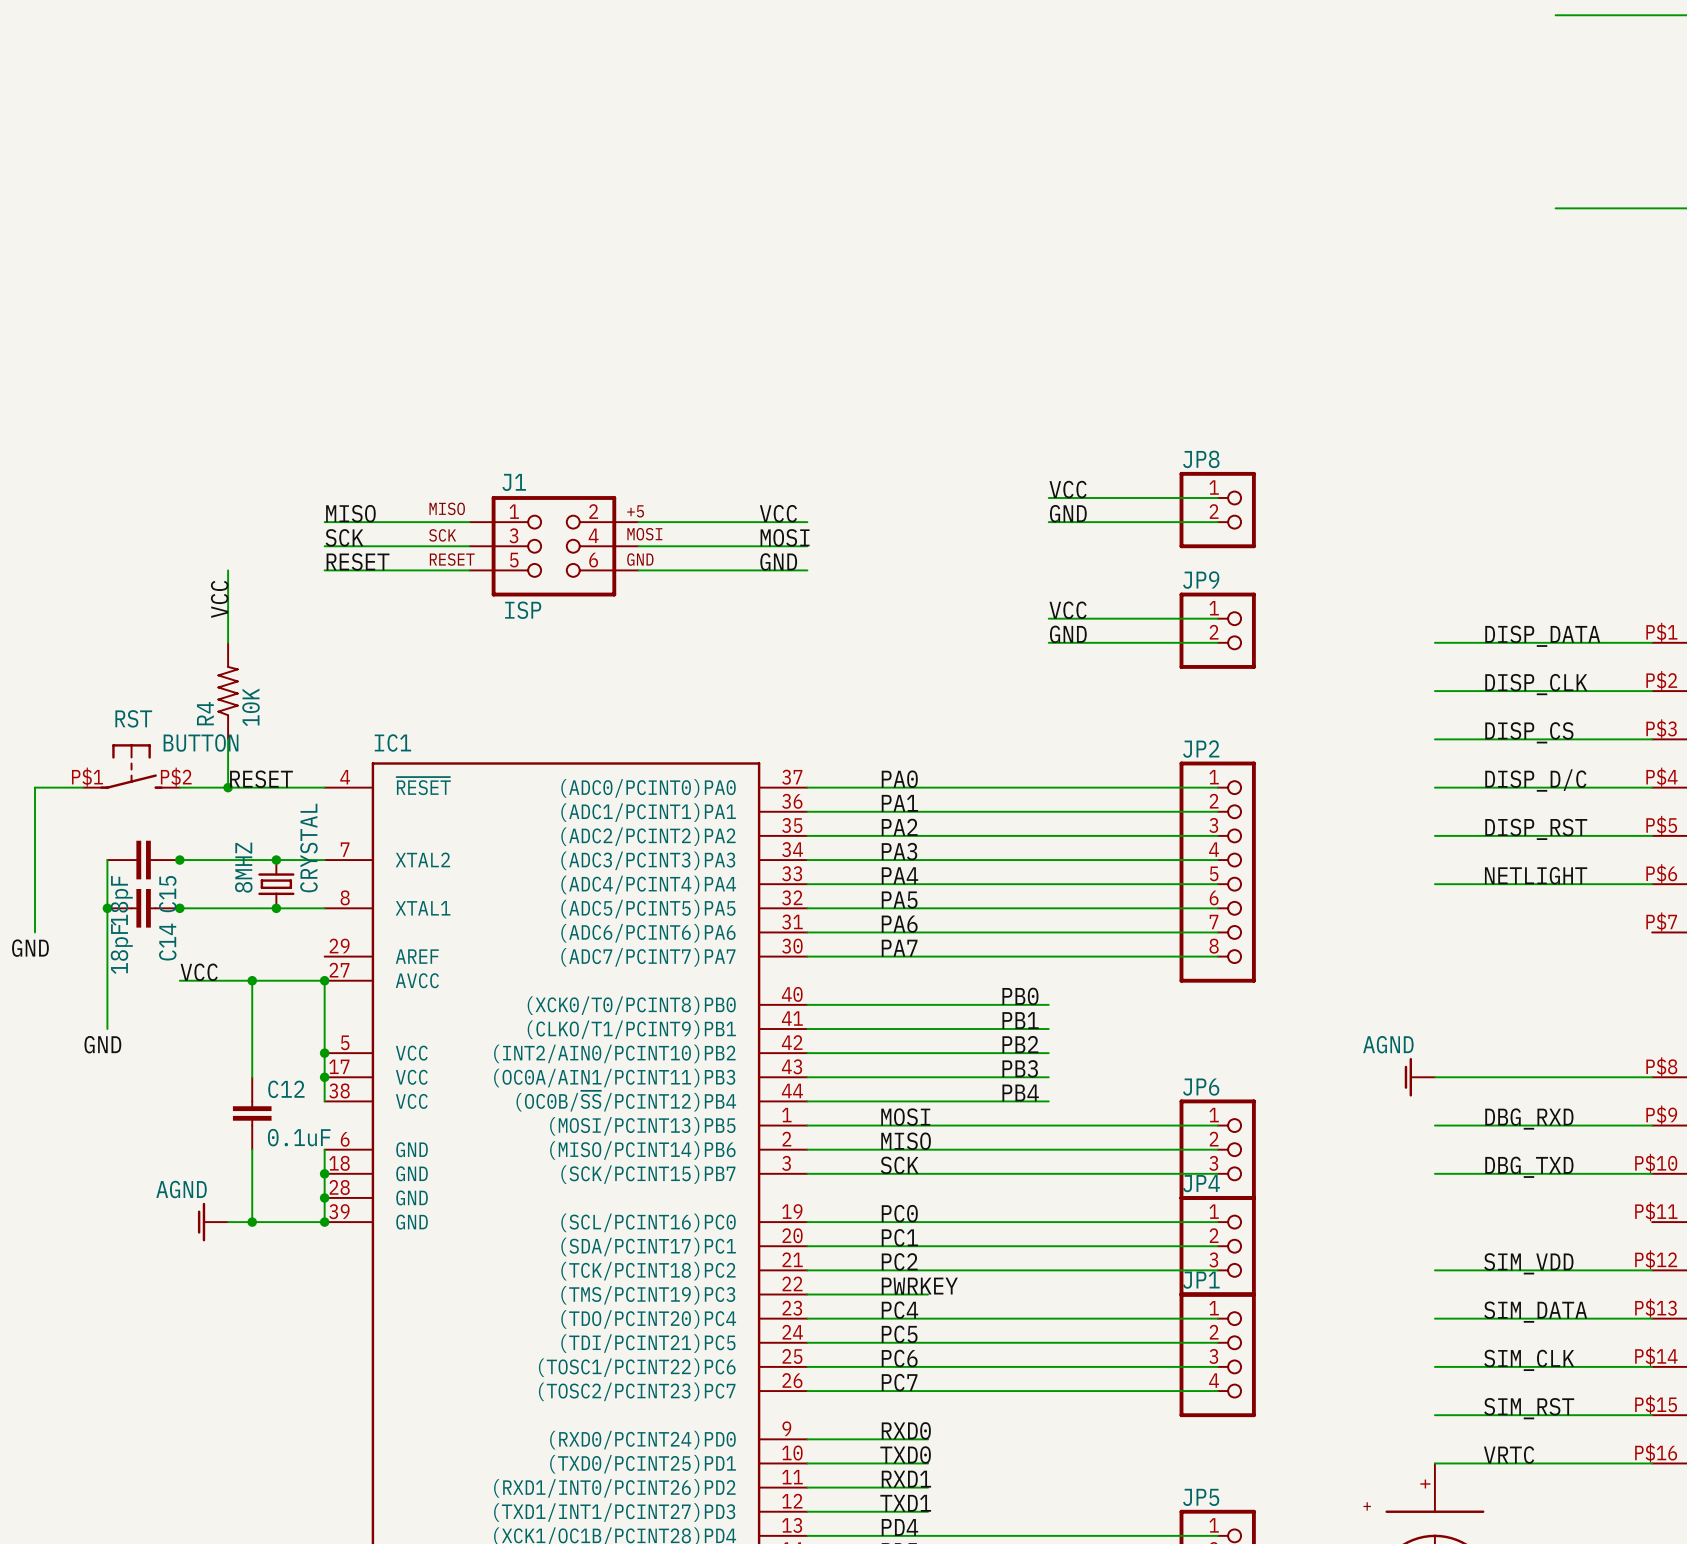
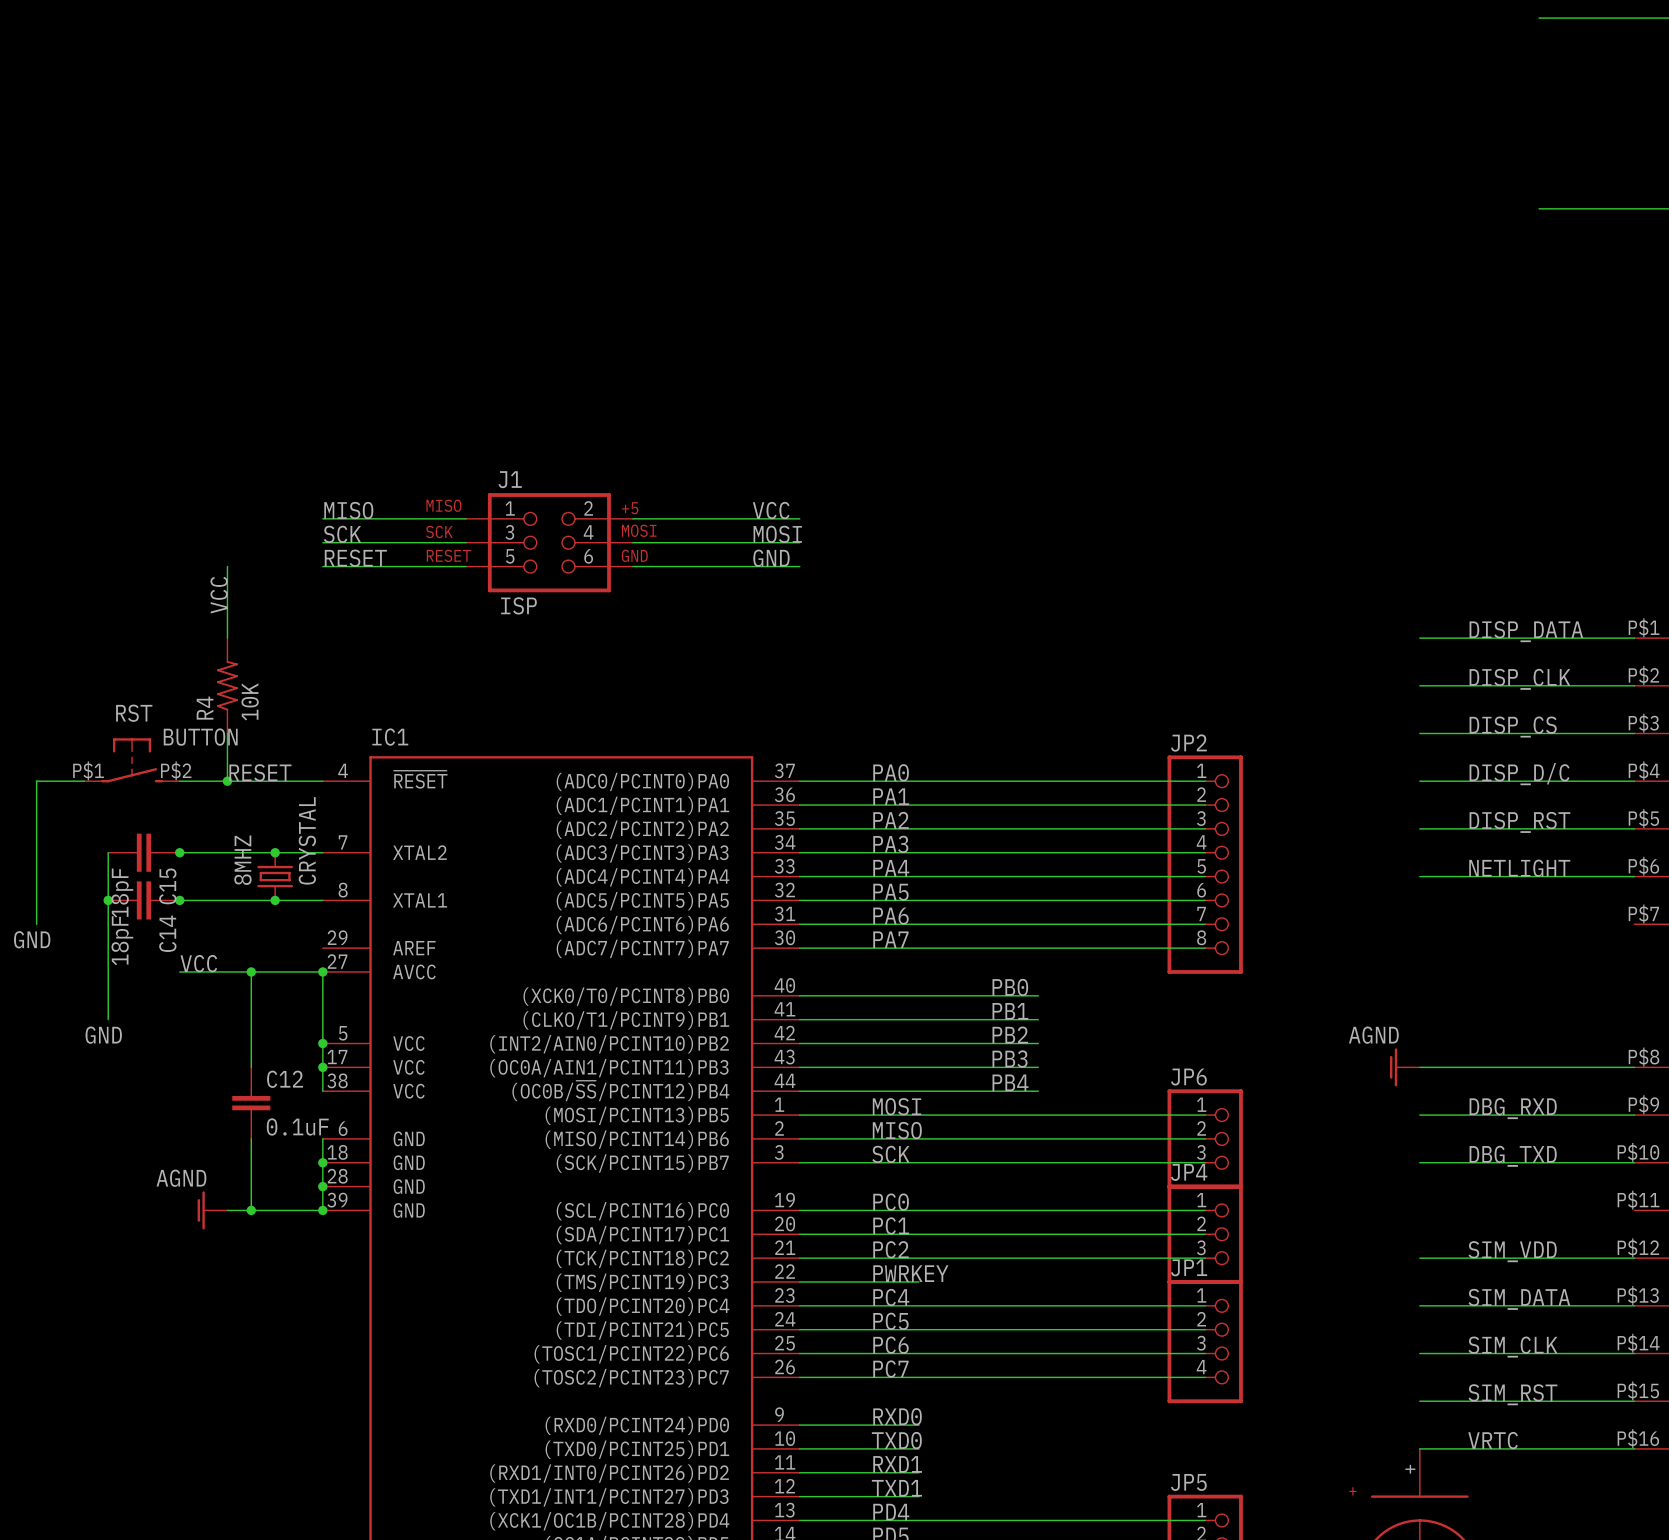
label: VCC (1068, 489) -> none
wire: (1048, 497) (1217, 497) -> none
JP8: (1217, 510) -> none
label: GND (1068, 513) -> none
wire: (1048, 522) (1217, 522) -> none
label: VCC (1068, 610) -> none
wire: (1048, 618) (1217, 618) -> none
JP9: (1217, 630) -> none
label: GND (1068, 634) -> none
wire: (1048, 642) (1217, 642) -> none

